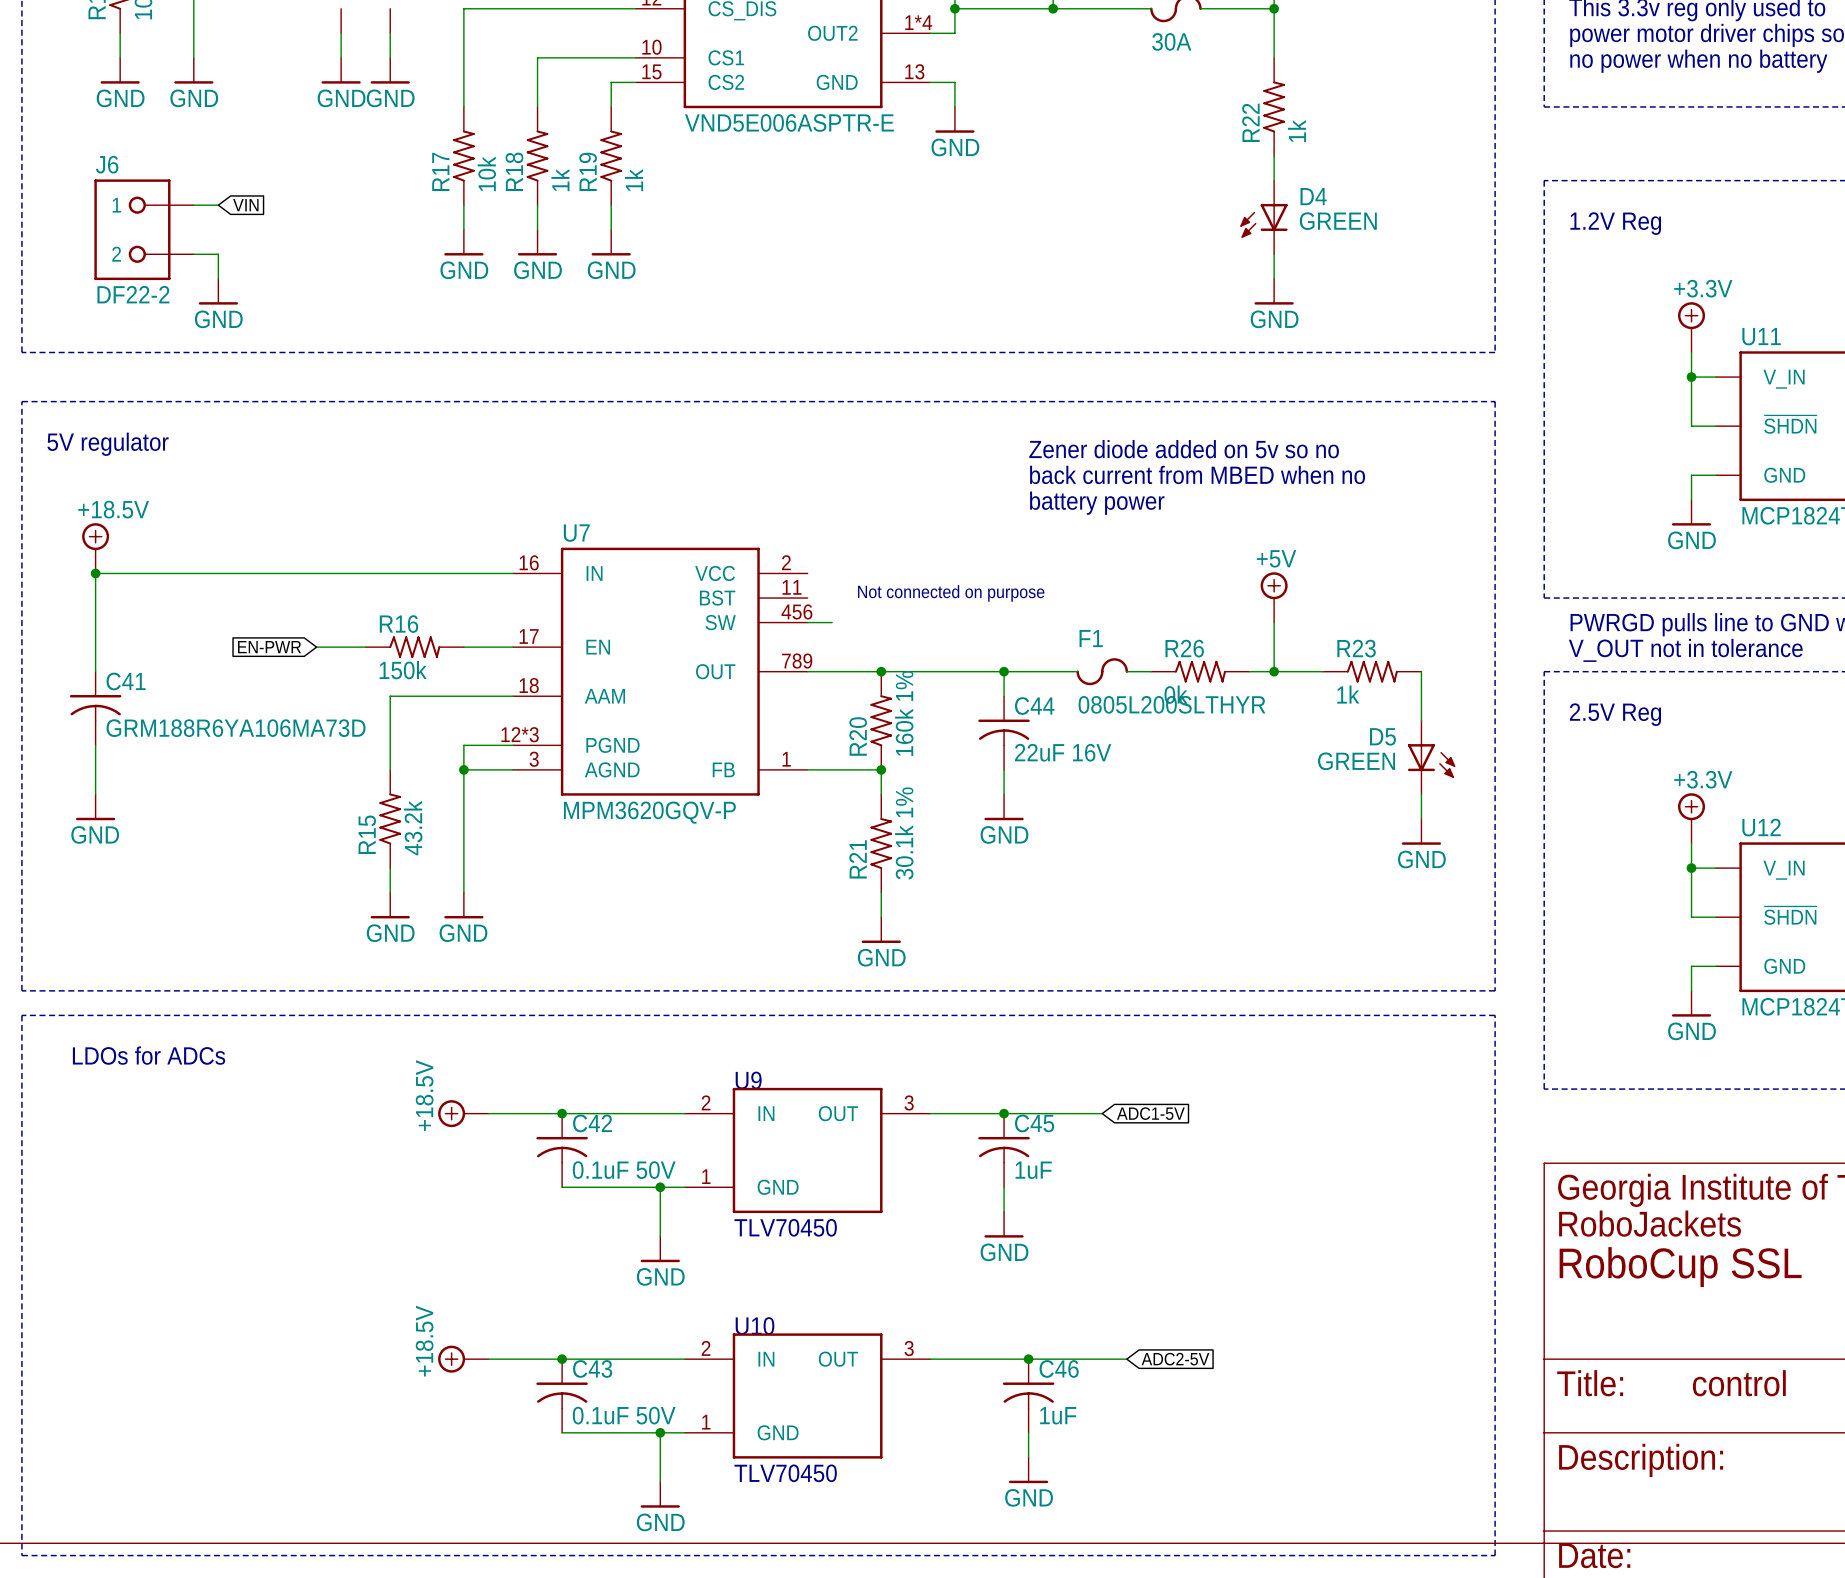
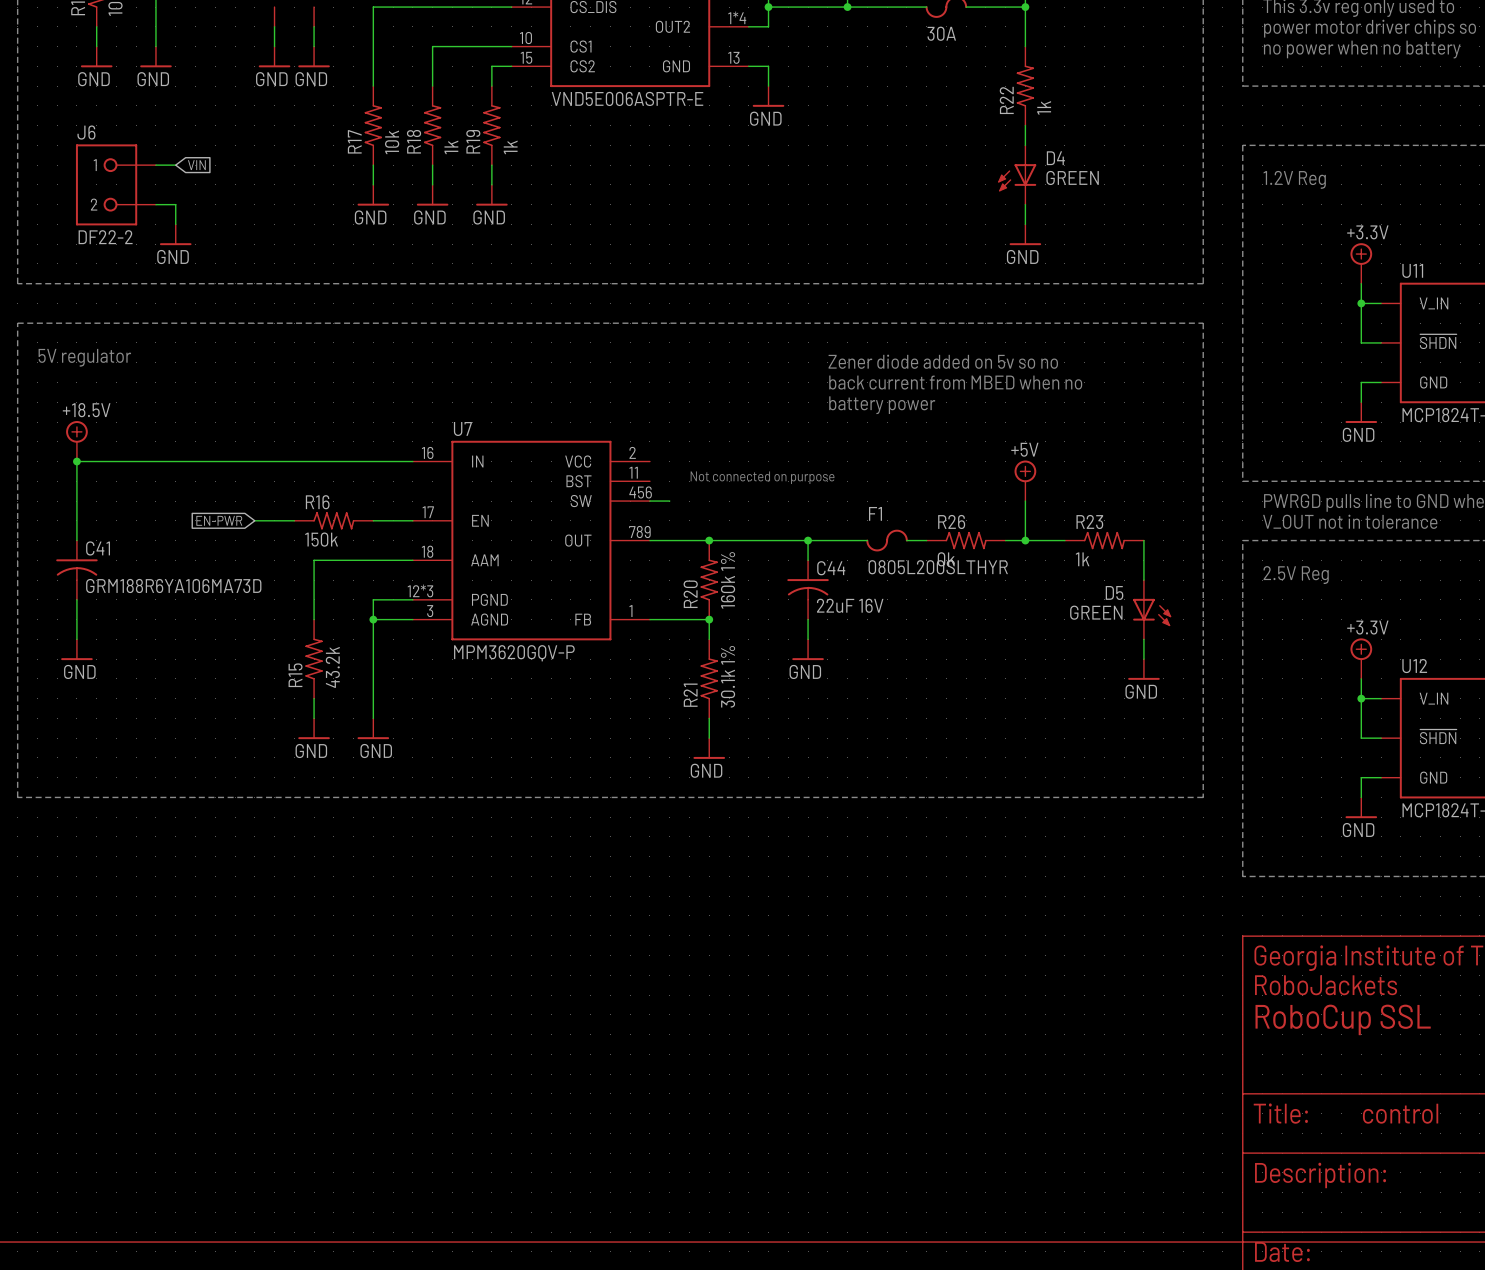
line: (21, 1015) (21, 1555) (1495, 1555) (1495, 1015) (21, 1015) -> none
text: LDOs for ADCs (149, 1055) -> none
power symbol: +18.5V (463, 1113) -> none
wire: (488, 1113) (684, 1113) -> none
junction: (562, 1113) -> none
wire: (930, 1113) (1102, 1113) -> none
junction: (1004, 1113) -> none
global label: ADC1-5V (1150, 1113) -> none
C42: 0.1uF 50V (562, 1150) -> none
U9: TLV70450 (807, 1150) -> none
C45: 1uF (1004, 1150) -> none
wire: (562, 1187) (684, 1187) -> none
wire: (660, 1187) (660, 1236) -> none
junction: (660, 1187) -> none
wire: (1004, 1187) (1004, 1211) -> none
power symbol: GND (1004, 1224) -> none
power symbol: GND (660, 1249) -> none
power symbol: +18.5V (463, 1359) -> none
wire: (488, 1359) (684, 1359) -> none
junction: (562, 1359) -> none
wire: (930, 1359) (1126, 1359) -> none
junction: (1028, 1359) -> none
global label: ADC2-5V (1175, 1359) -> none
C43: 0.1uF 50V (562, 1395) -> none
U10: TLV70450 (807, 1395) -> none
C46: 1uF (1028, 1395) -> none
wire: (562, 1432) (684, 1432) -> none
wire: (660, 1432) (660, 1481) -> none
junction: (660, 1432) -> none
wire: (1028, 1432) (1028, 1457) -> none
power symbol: GND (1028, 1470) -> none
power symbol: GND (660, 1494) -> none

